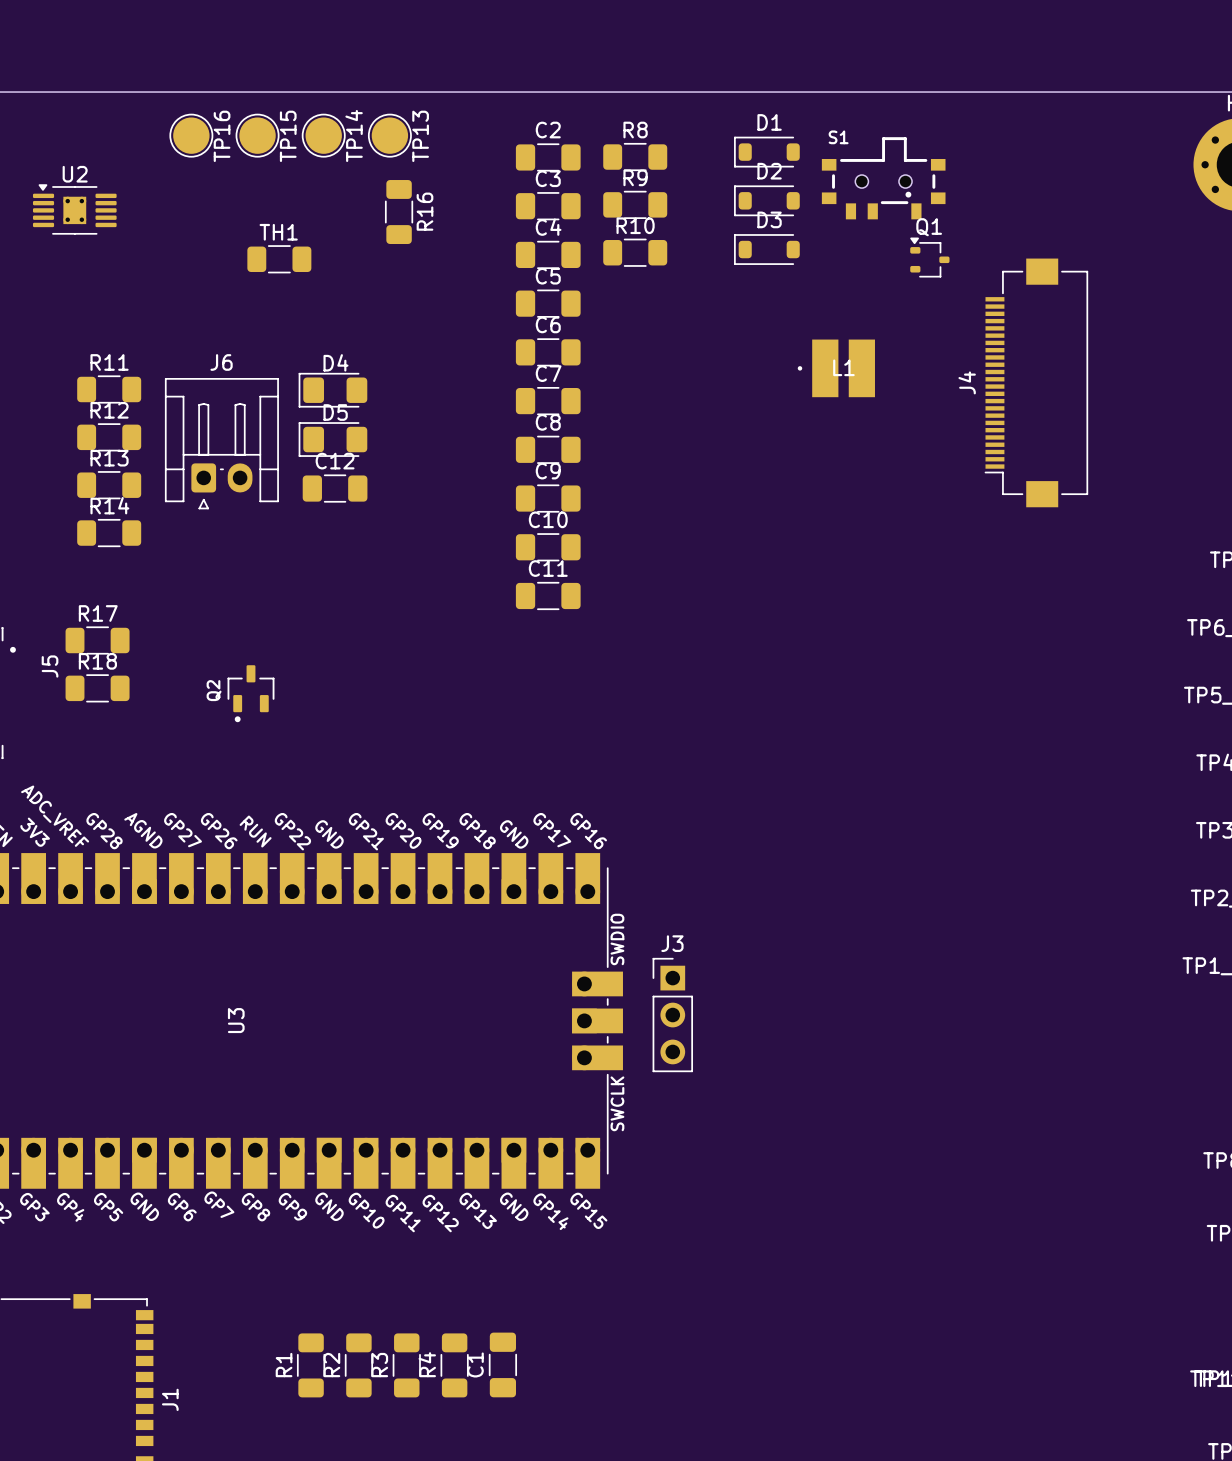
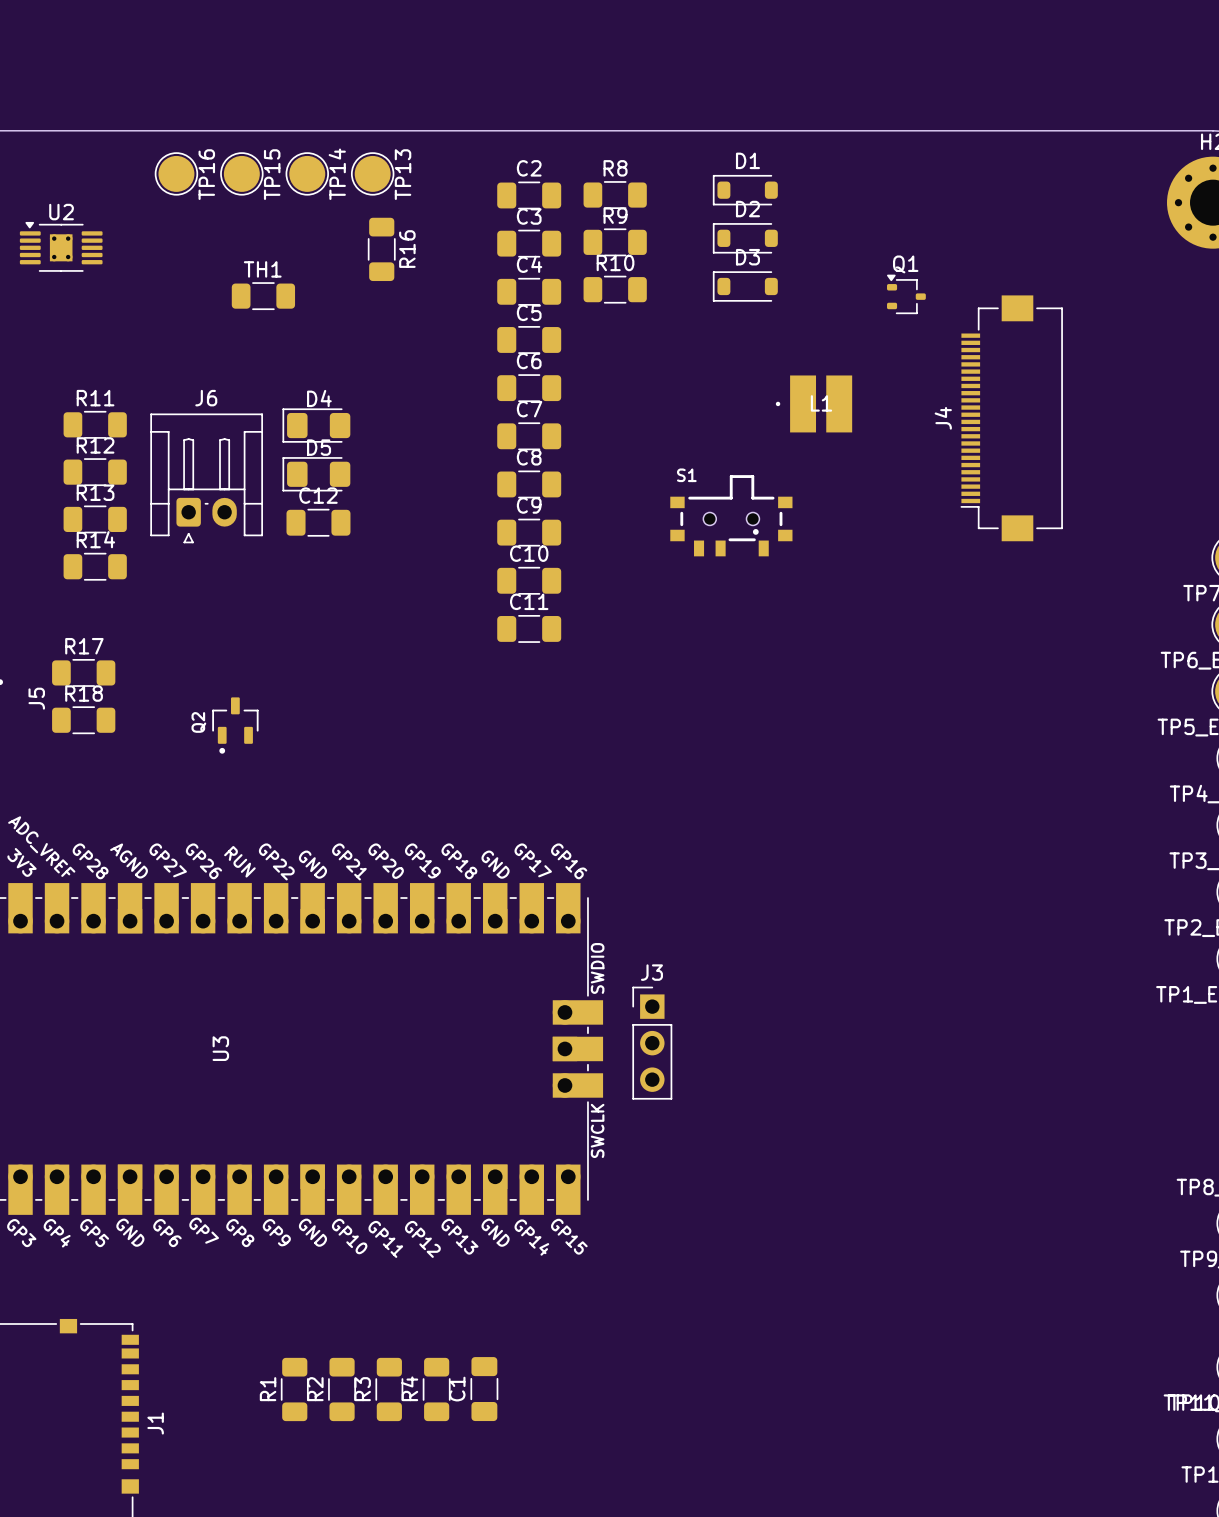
S1 position: (883, 178) -> (731, 515)

